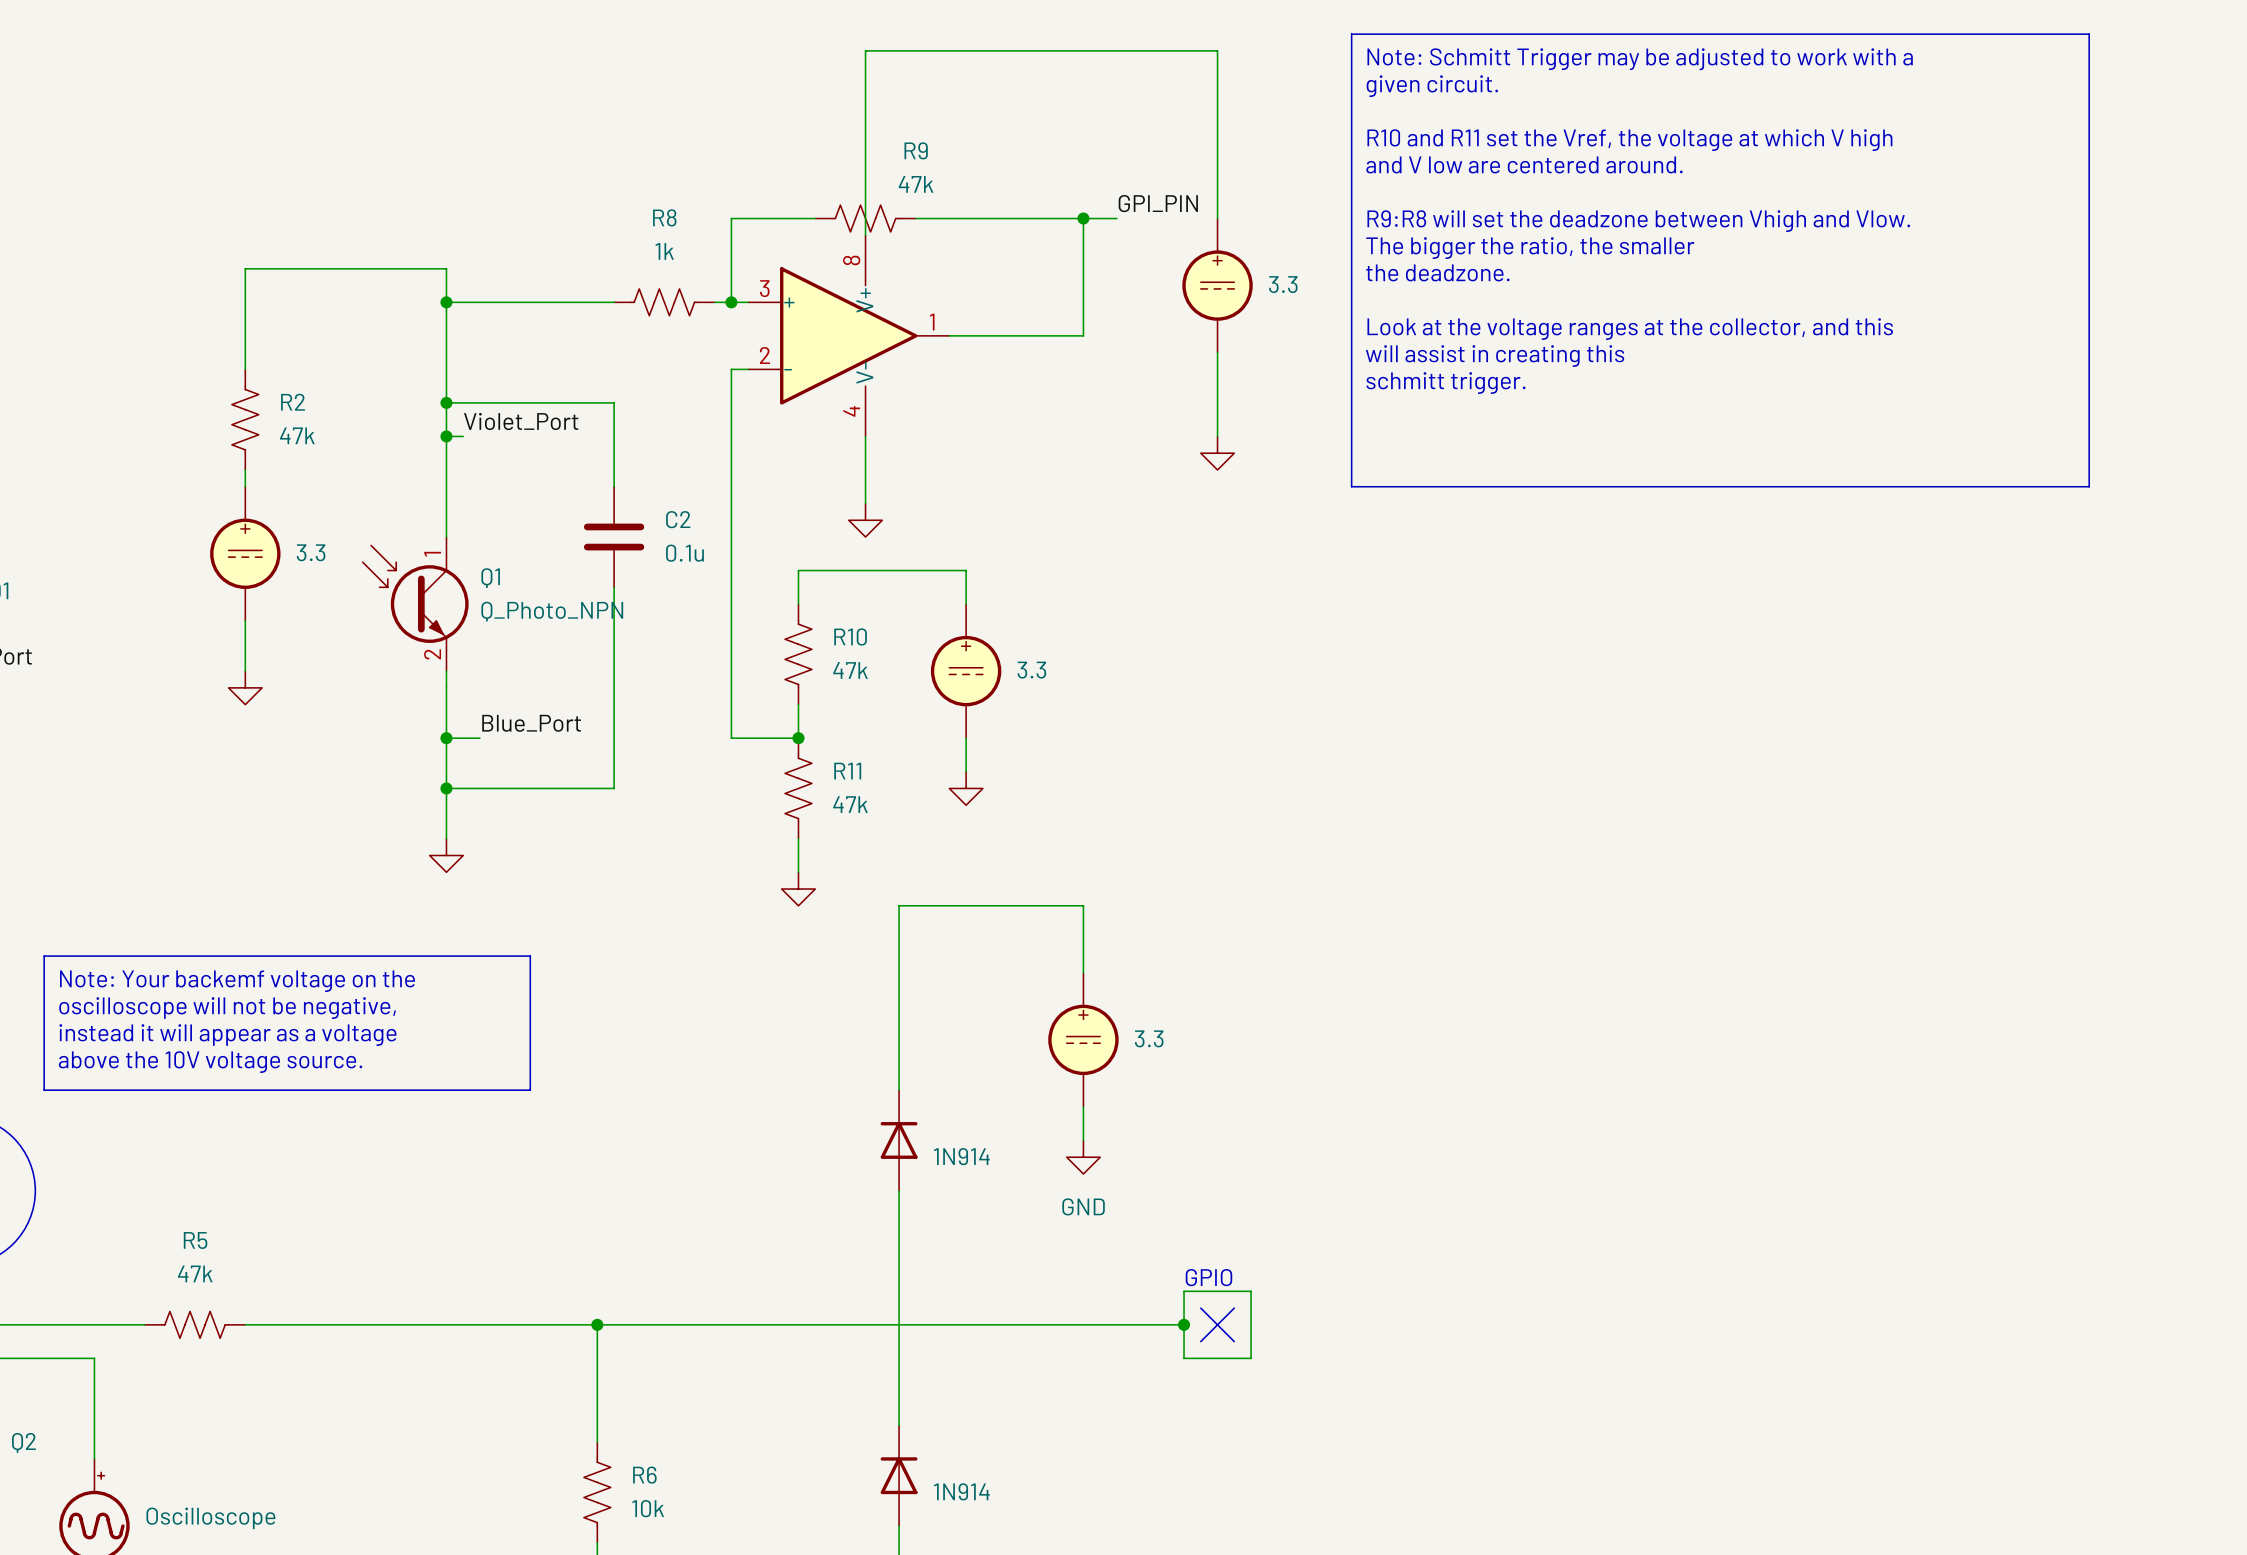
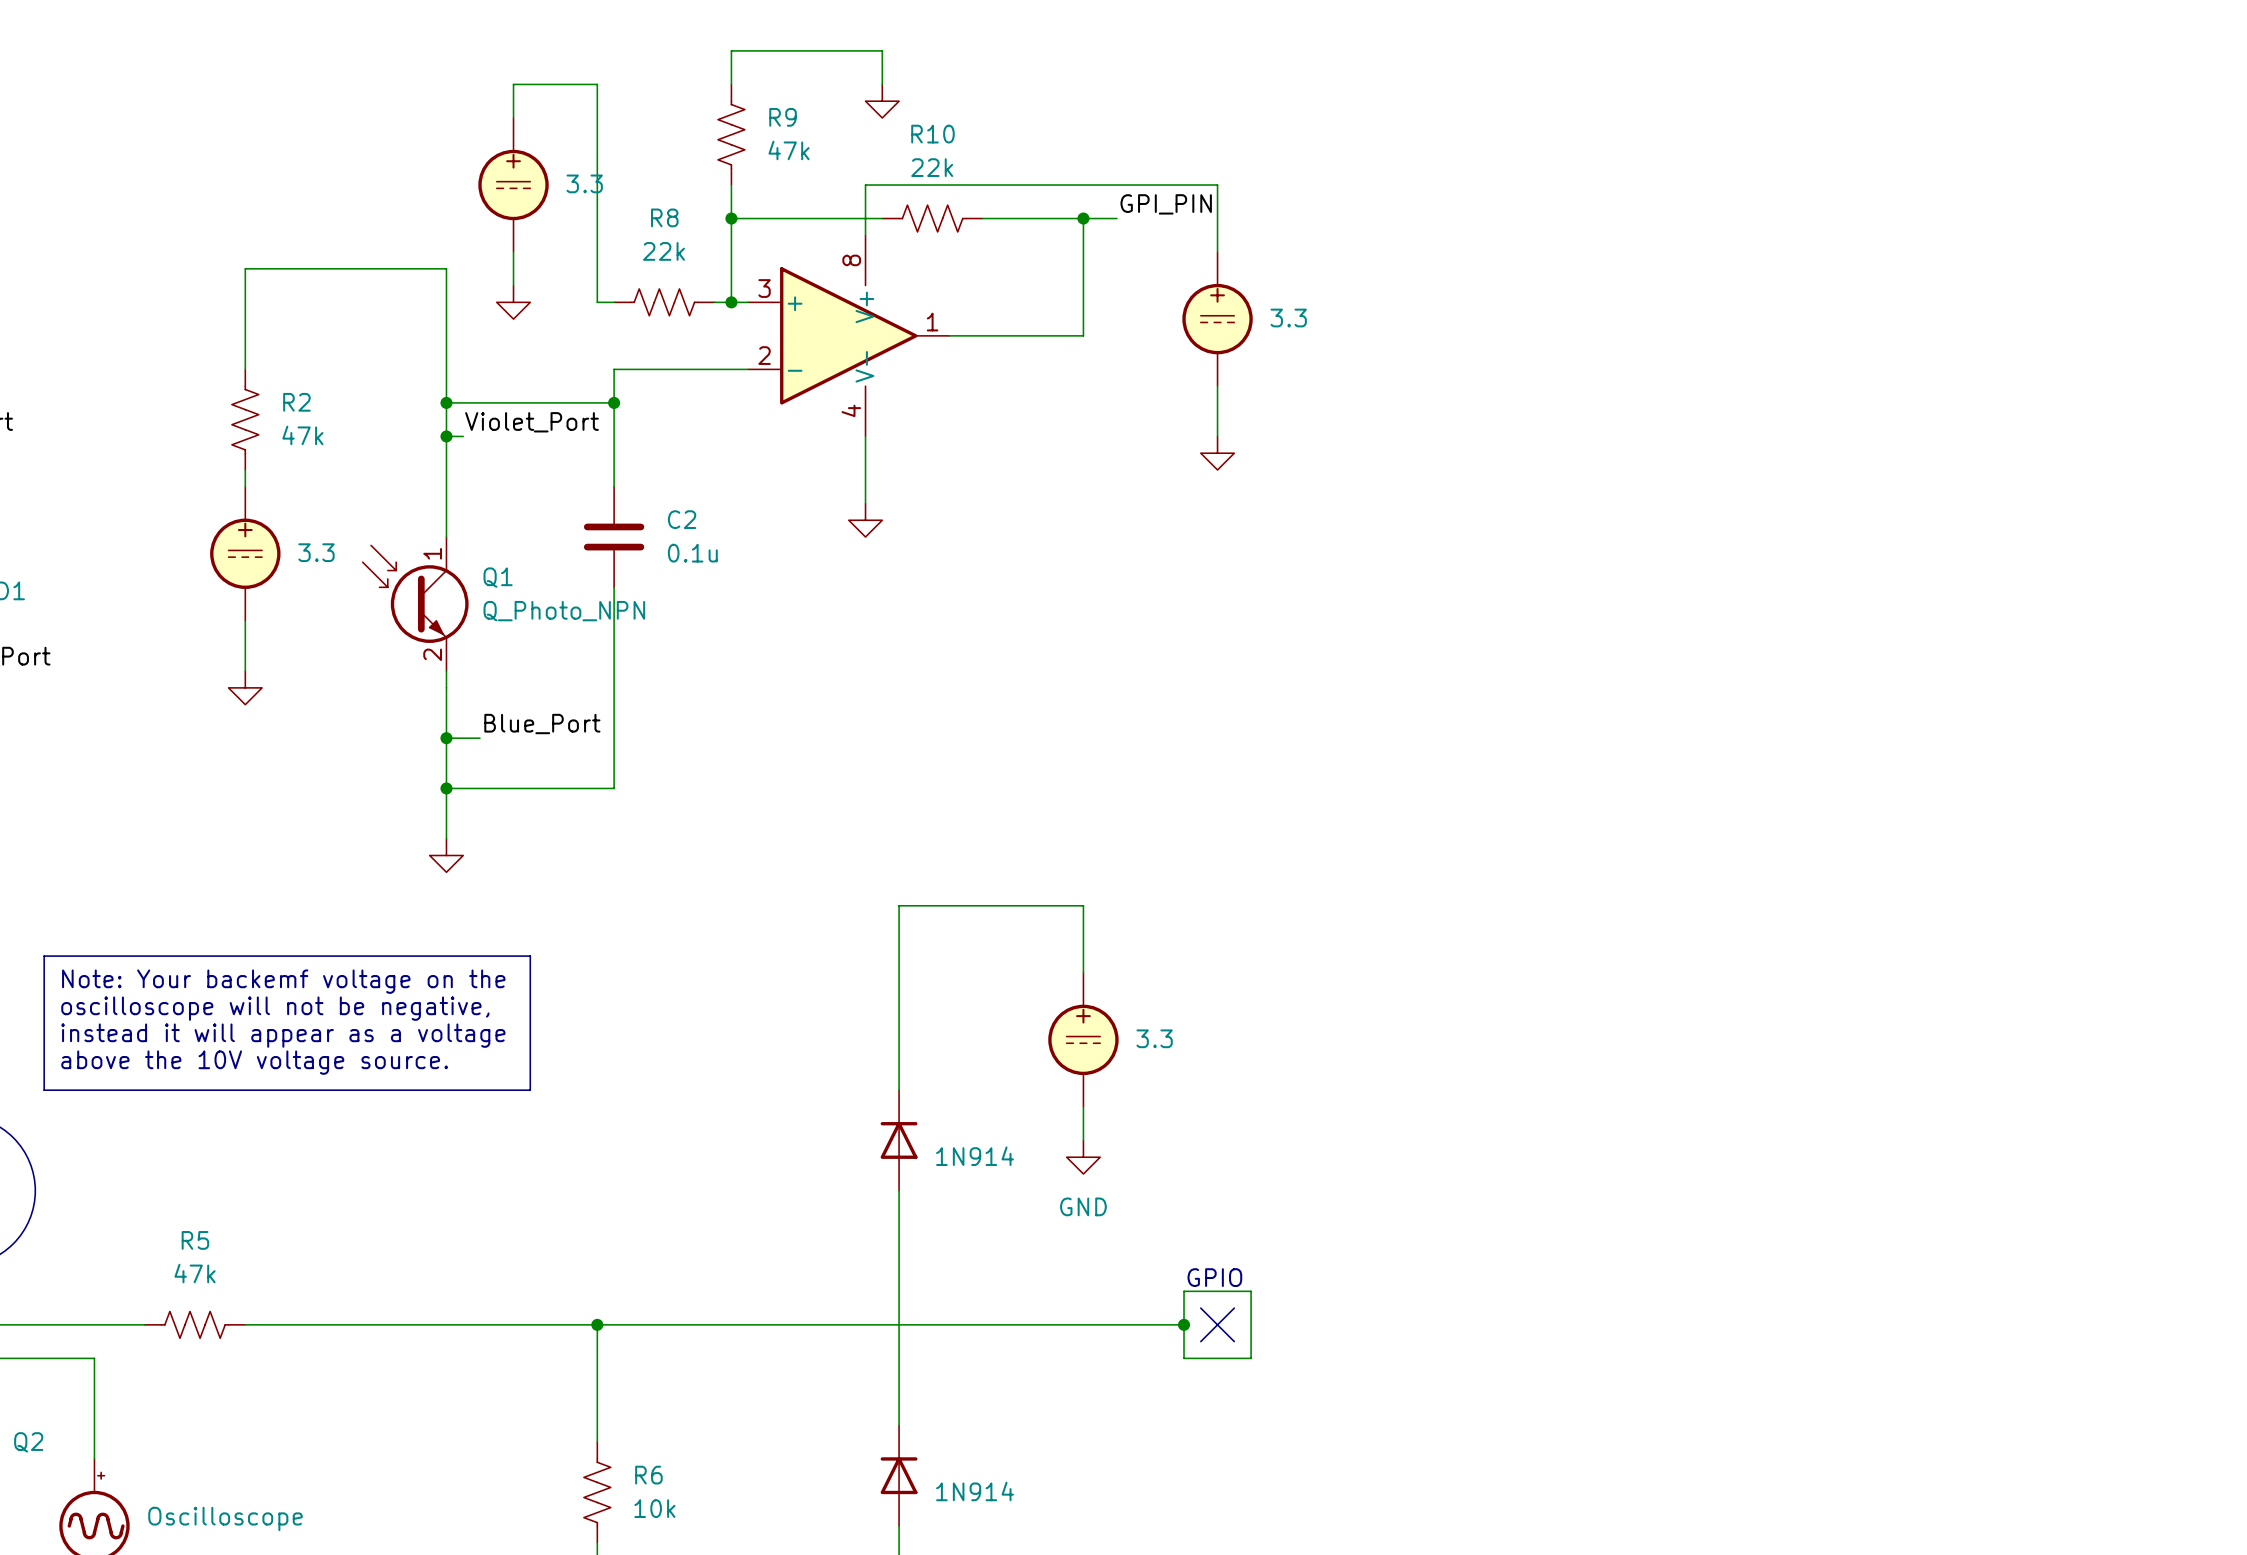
line: (1351, 34) (2089, 34) (2089, 486) (1351, 486) (1351, 34) -> none
wire: (865, 50) (865, 185) -> (865, 50) (731, 50) (731, 84)
wire: (882, 50) (1217, 50) (1217, 185) -> (865, 185) (1217, 185)
wire: none -> (882, 50) (882, 84)
text: Note: Schmitt Trigger may be adjusted to work with a (1640, 59) -> none
text: given circuit. (1432, 86) -> none
power symbol: none -> (882, 101)
text: R10 and R11 set the Vref, the voltage at which V high (1629, 140) -> none
R9 name position: R9 (916, 150) -> R9 (783, 117)
text: and V low are centered around. (1524, 164) -> none
R9 value position: 47k (916, 184) -> 47k (789, 150)
part: none -> 3.3 (513, 185)
wire: none -> (731, 185) (731, 218)
junction: none -> (731, 218)
R9 rotation: 0° (865, 218) -> 90° clockwise (731, 134)
R9 position: (865, 218) -> (731, 134)
wire: (915, 218) (982, 218) -> (815, 218) (882, 218)
text: R9:R8 will set the deadzone between Vhigh and Vlow. (1638, 221) -> none
text: The bigger the ratio, the smaller (1530, 248) -> none
R8 value: 1k (664, 251) -> 22k (663, 251)
wire: none -> (513, 252) (513, 285)
text: the deadzone. (1437, 272) -> none
part position: (1217, 285) -> (1217, 319)
wire: (446, 302) (597, 302) -> (513, 117) (513, 84) (597, 84) (597, 302)
junction: (446, 302) -> none
power symbol: none -> (513, 302)
text: Look at the voltage ranges at the collector, and this (1630, 329) -> none
text: will assist in creating this (1495, 356) -> none
wire: (731, 369) (731, 738) (798, 738) (798, 704) -> (731, 369) (614, 369) (614, 402)
text: schmitt trigger. (1446, 383) -> none
junction: none -> (614, 402)
wire: (798, 604) (798, 570) (966, 570) (966, 604) -> none
R10 name position: R10 (850, 636) -> R10 (932, 134)
R10 rotation: 0° (798, 654) -> 90° clockwise (932, 218)
R10 position: (798, 654) -> (932, 218)
R10 value: 47k (850, 670) -> 22k (932, 167)
part: 3.3 (966, 671) -> none
junction: (798, 738) -> none
wire: (966, 738) (966, 771) -> none
R11: 47k (798, 788) -> none
power symbol: (966, 788) -> none
wire: (798, 838) (798, 872) -> none
power symbol: (798, 889) -> none

